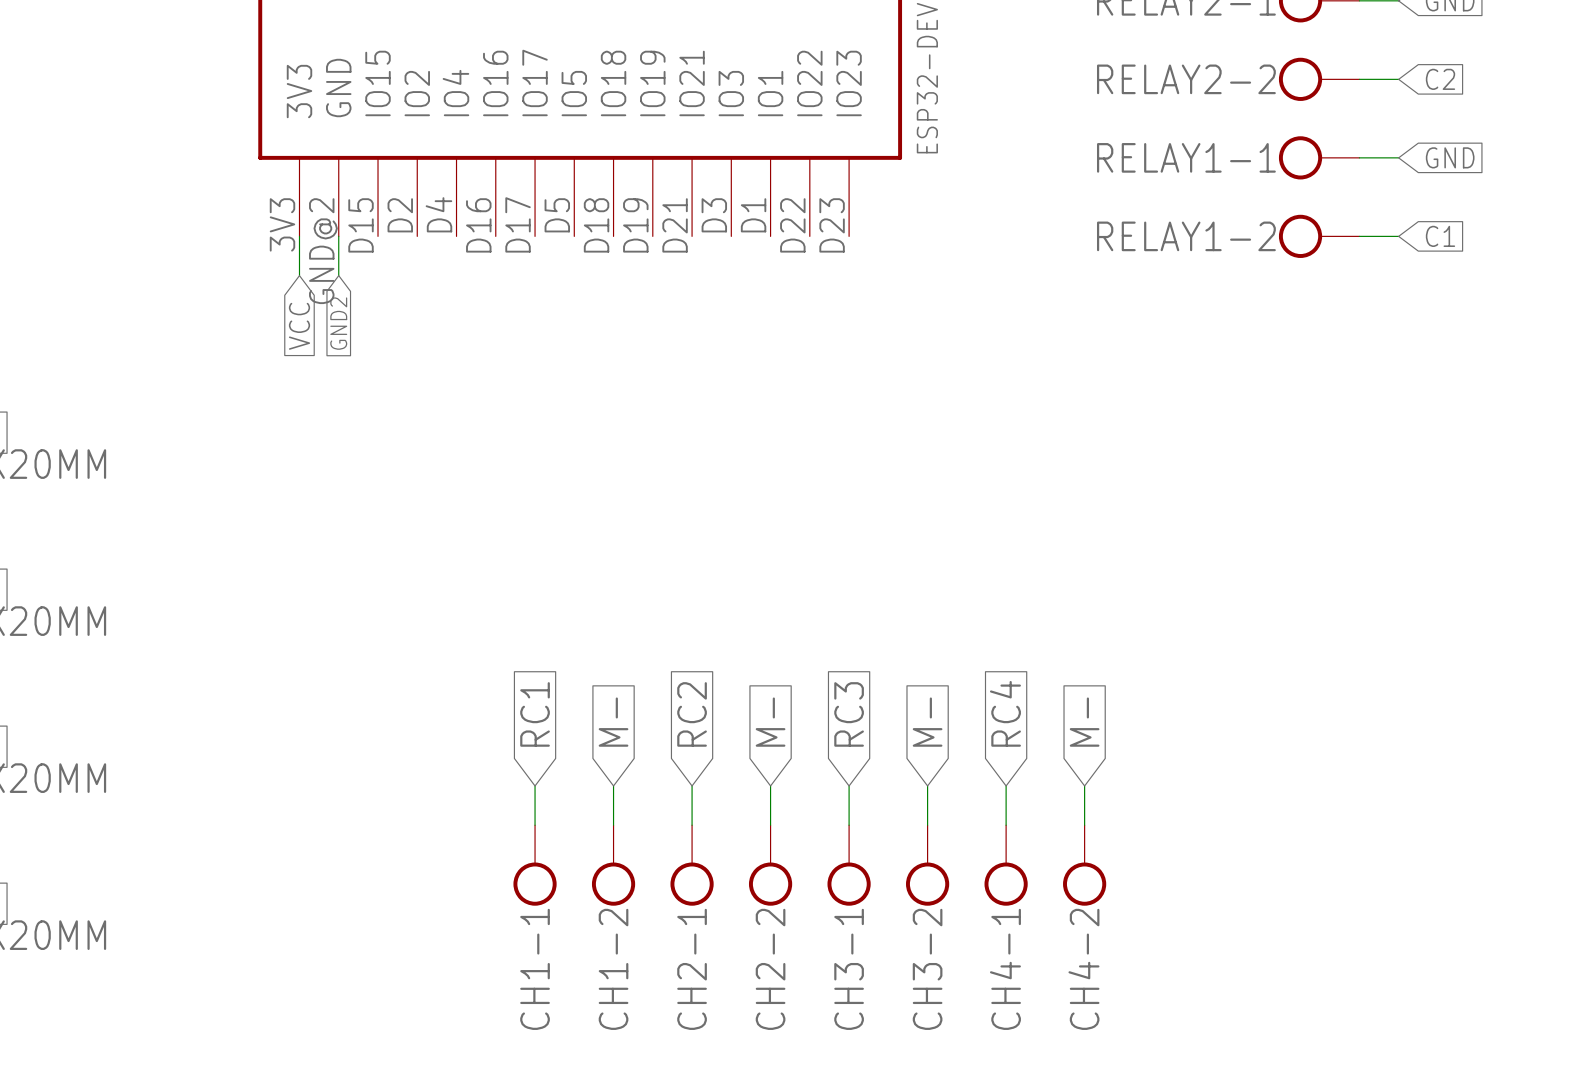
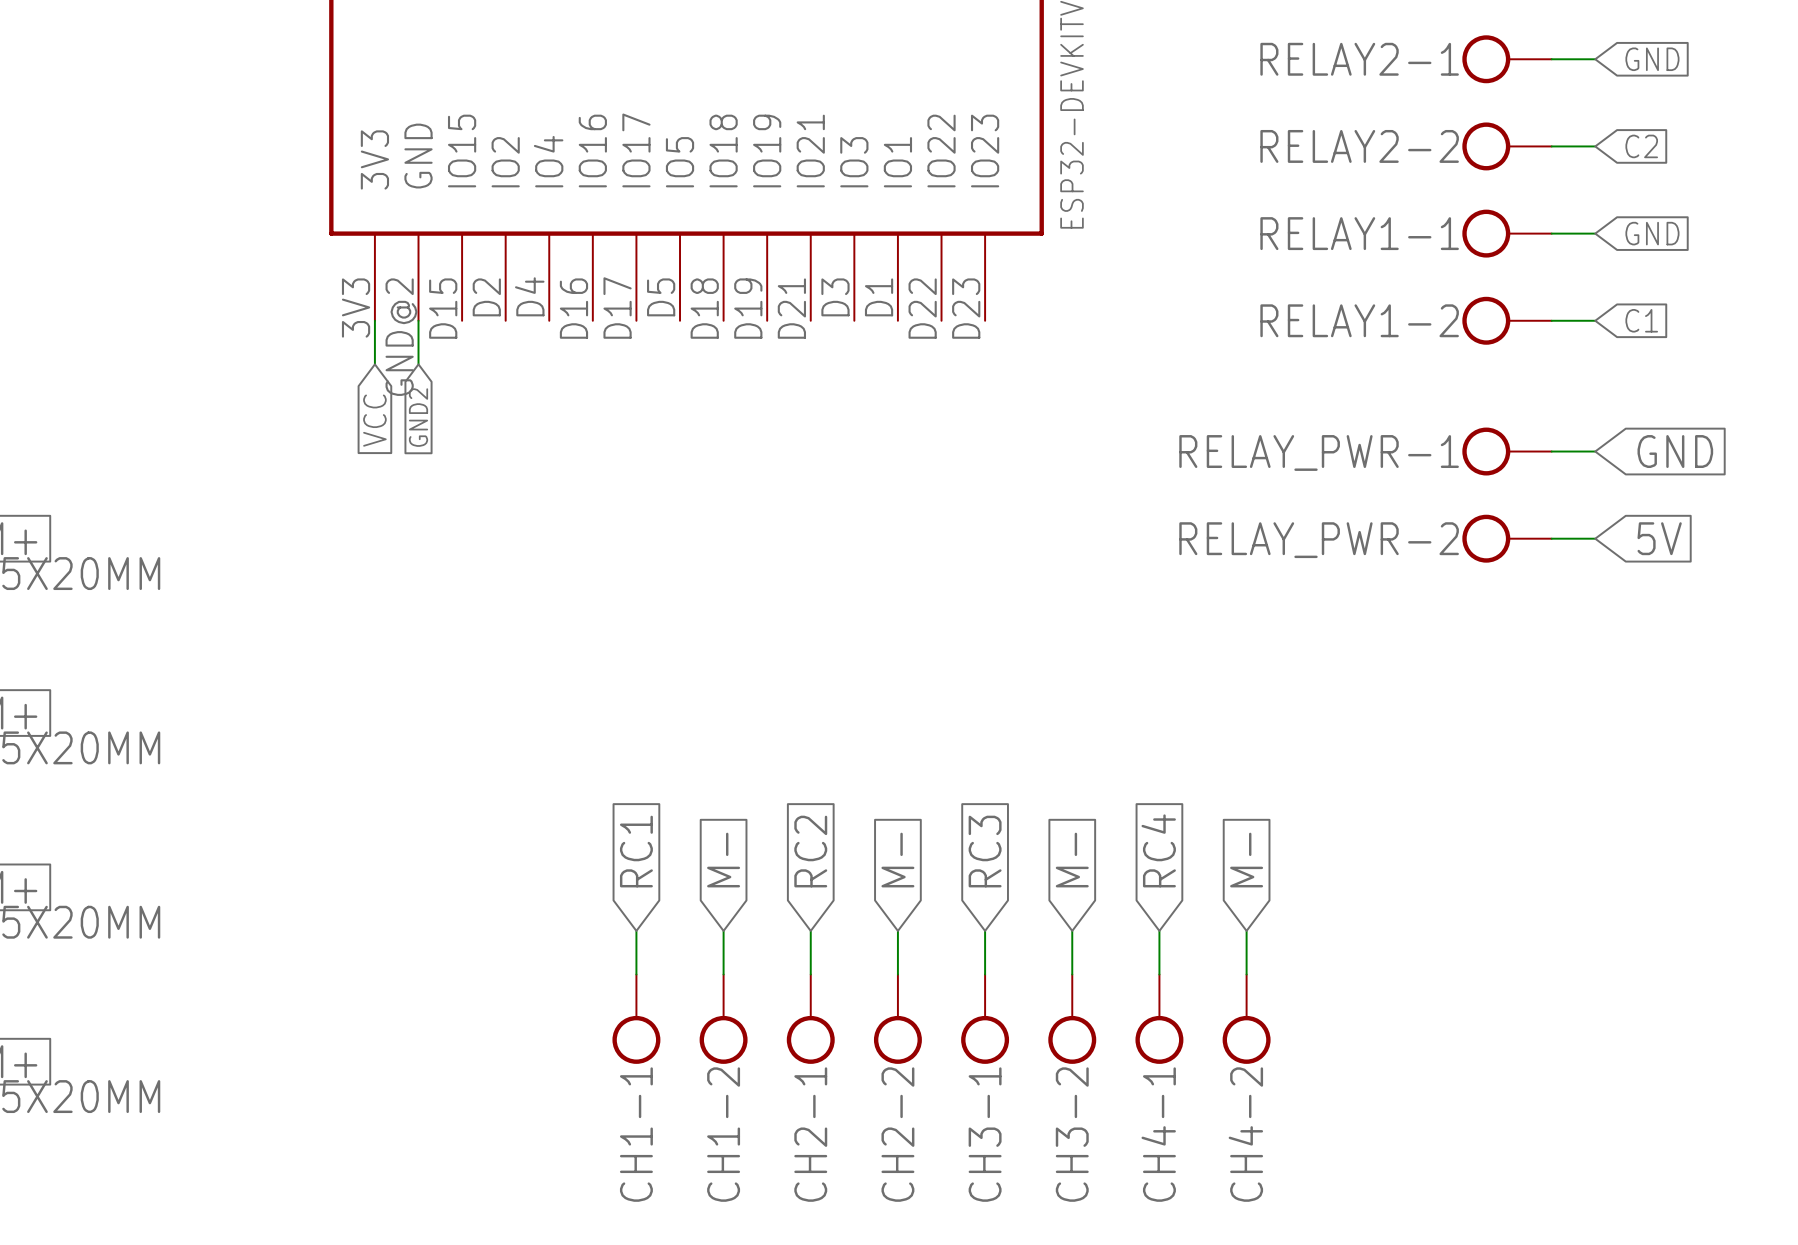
RELAY_PWR-1: none -> (1507, 451)
wire: none -> (1551, 451) (1595, 451)
global label: none -> GND (1675, 451)
RELAY_PWR-2: none -> (1507, 538)
wire: none -> (1551, 538) (1595, 538)
global label: none -> 5V (1659, 538)

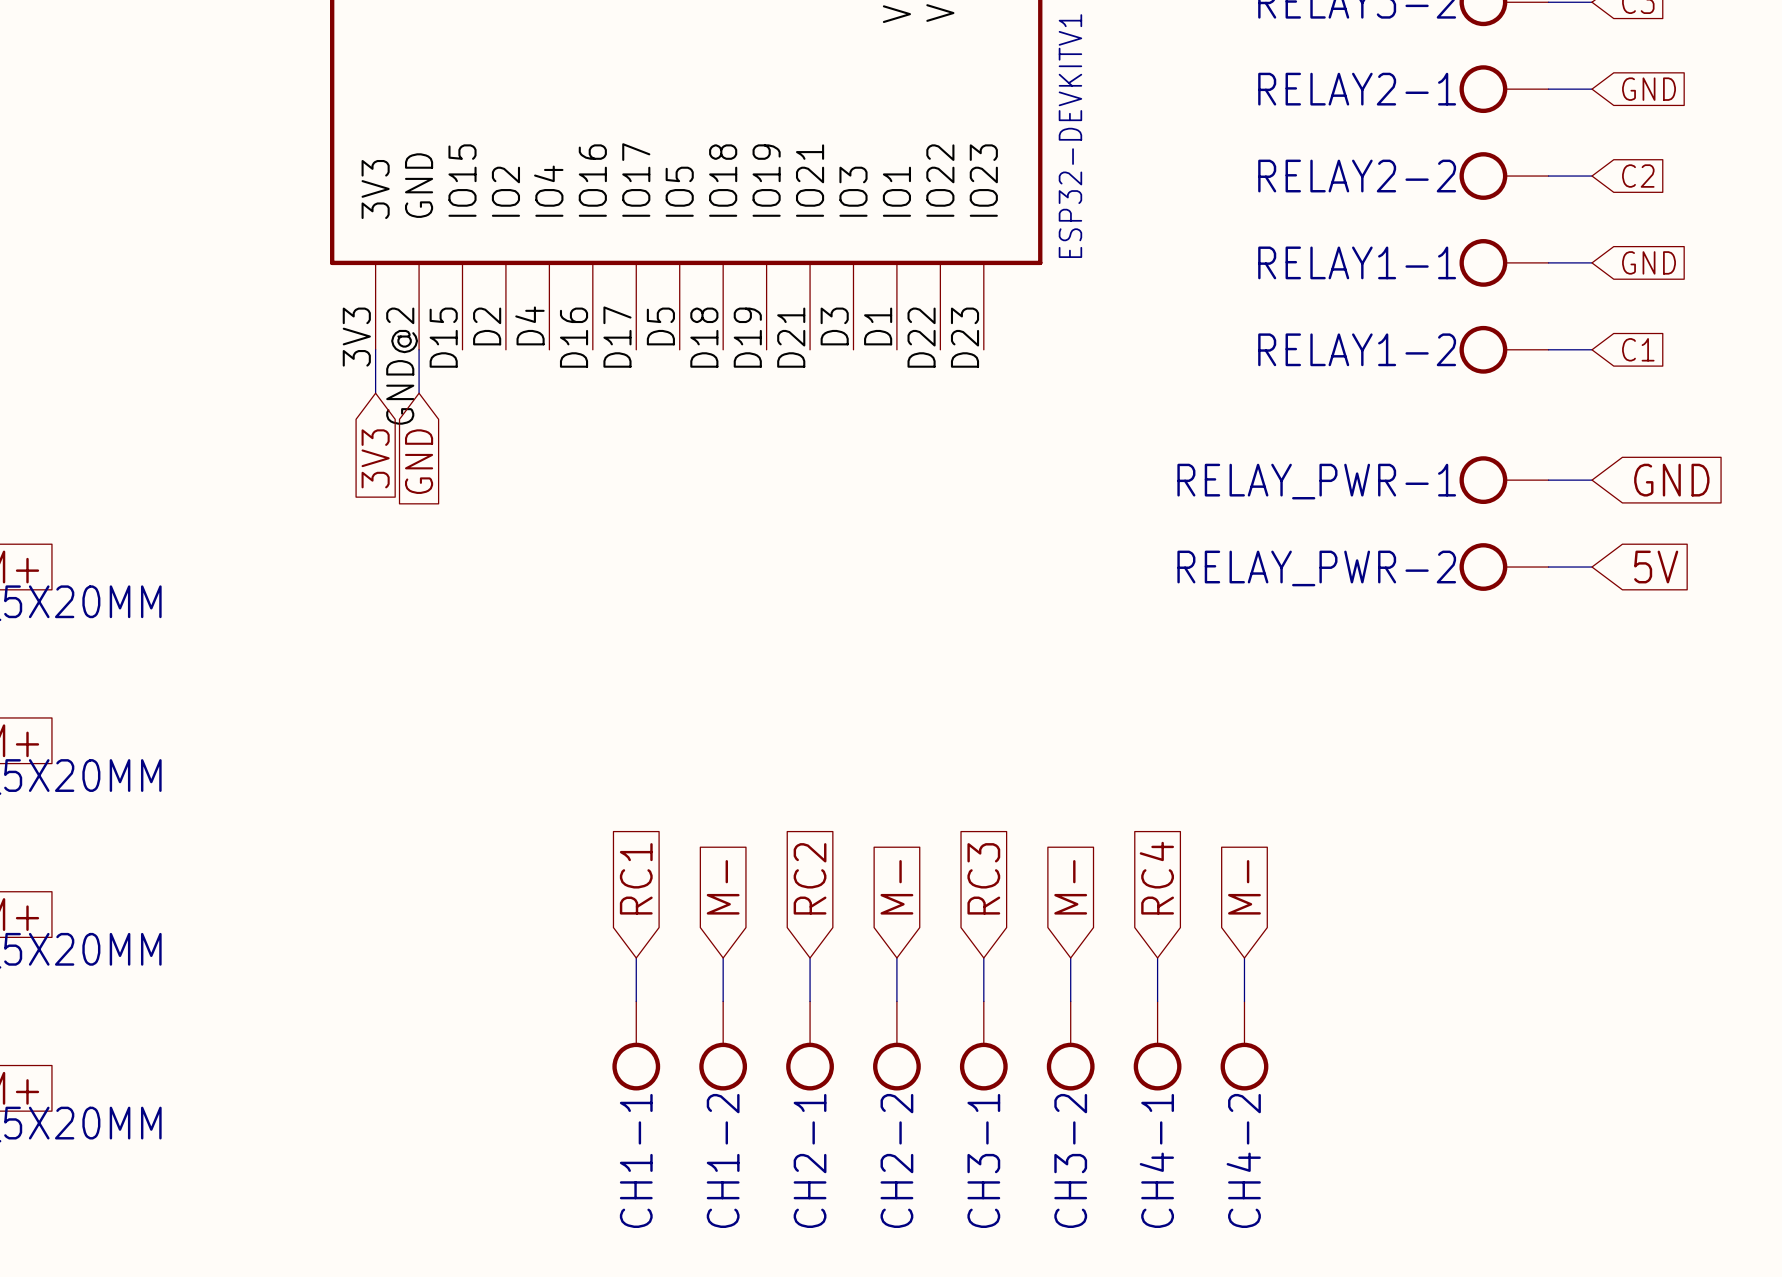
global label: GND2 (418, 417) -> GND (419, 461)
global label: VCC (374, 420) -> 3V3 (375, 458)

